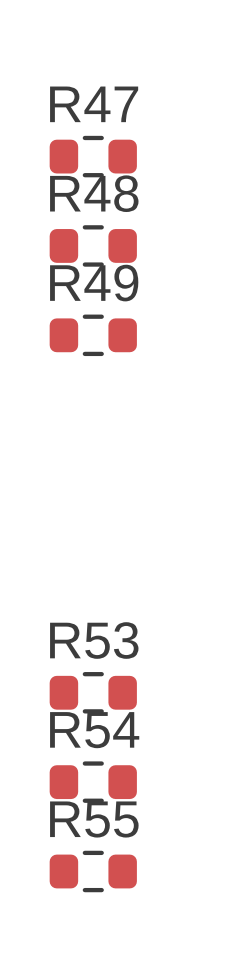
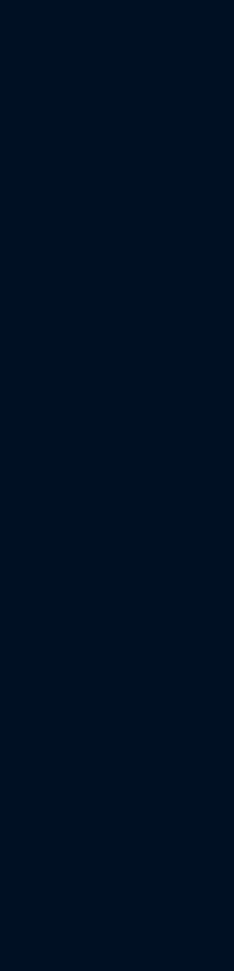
R47: (93, 156) -> none
R48: (93, 245) -> none
R49: (93, 335) -> none
R53: (93, 692) -> none
R54: (93, 782) -> none
R55: (93, 871) -> none

